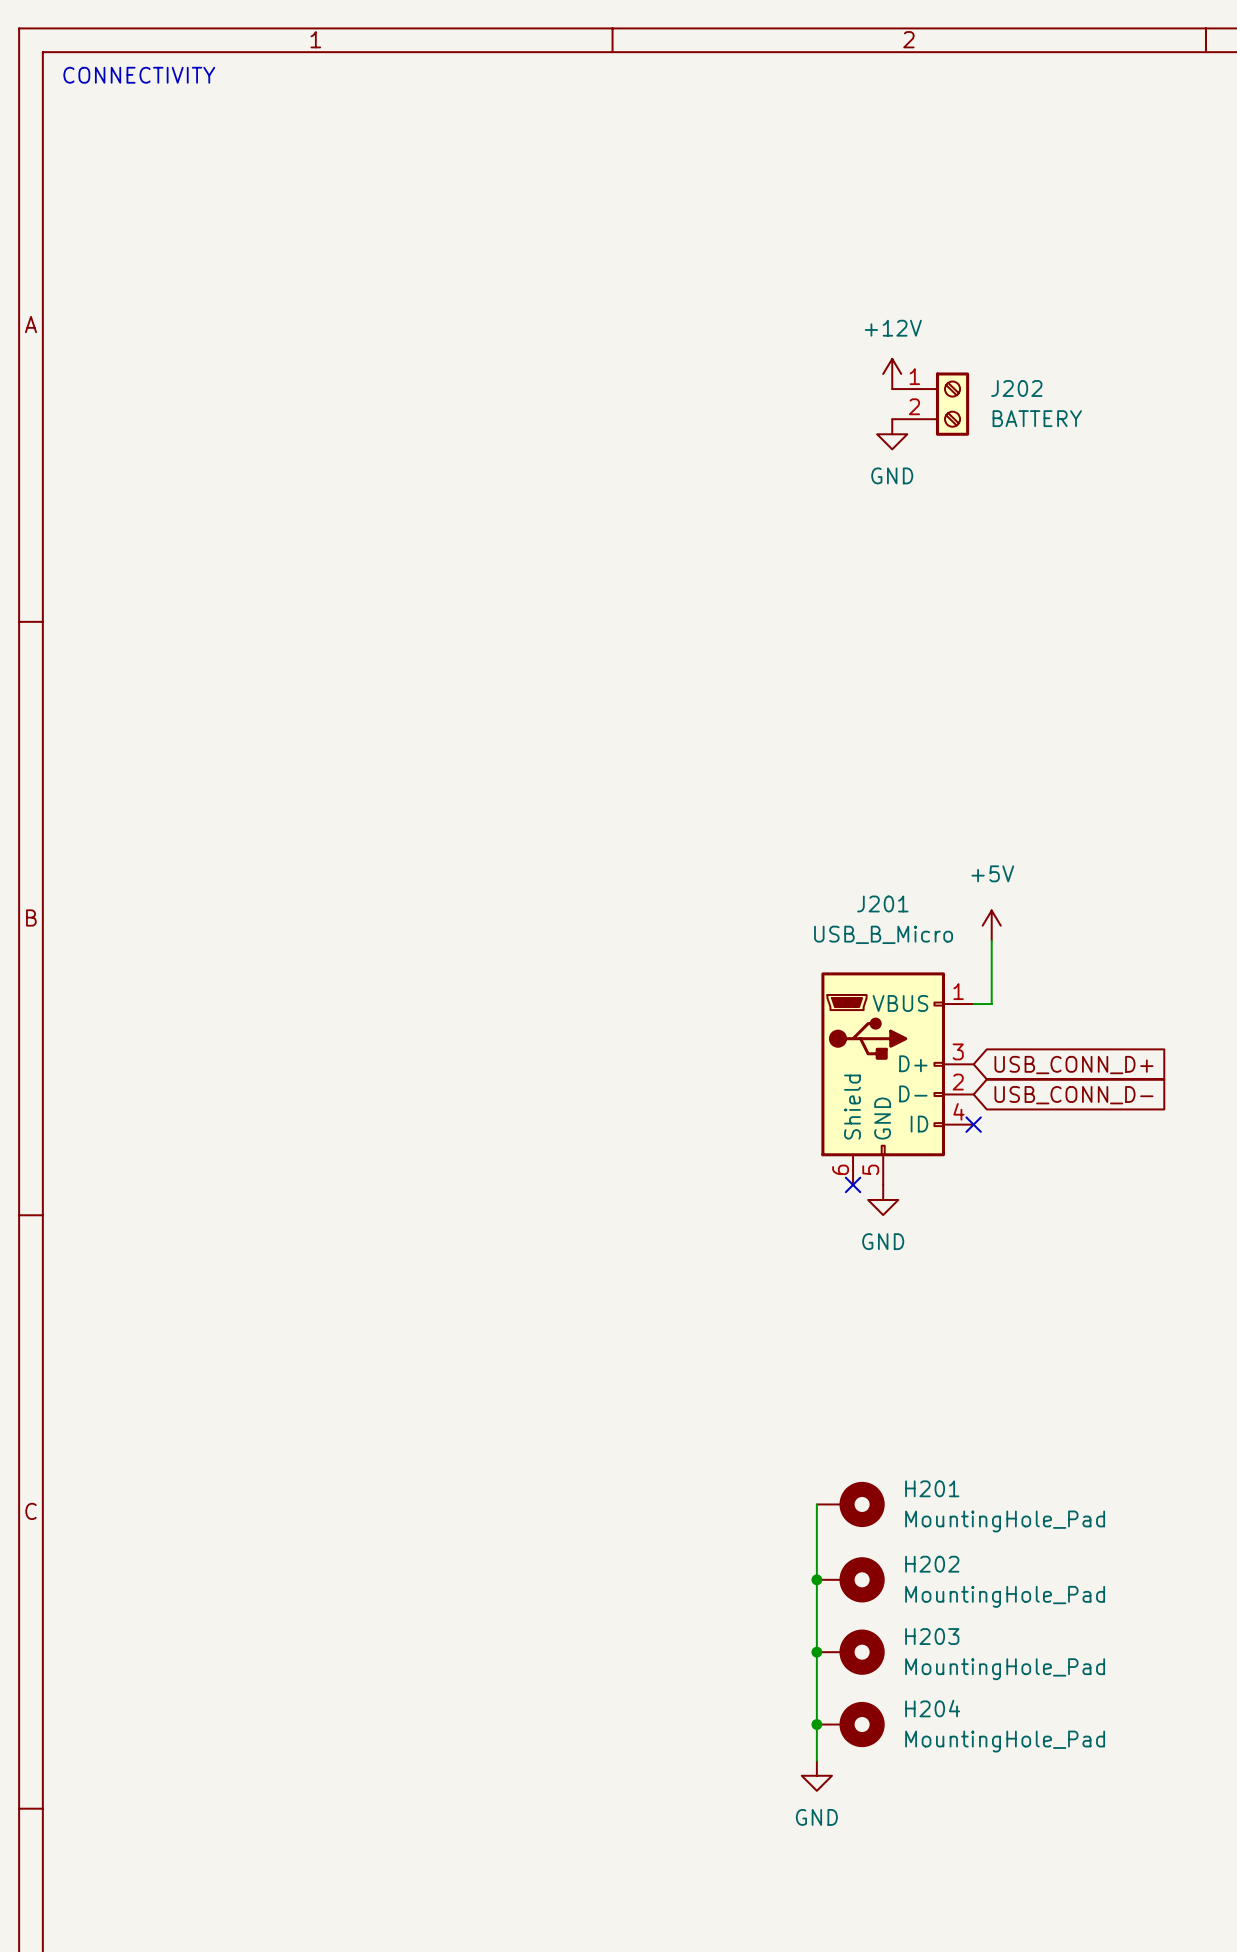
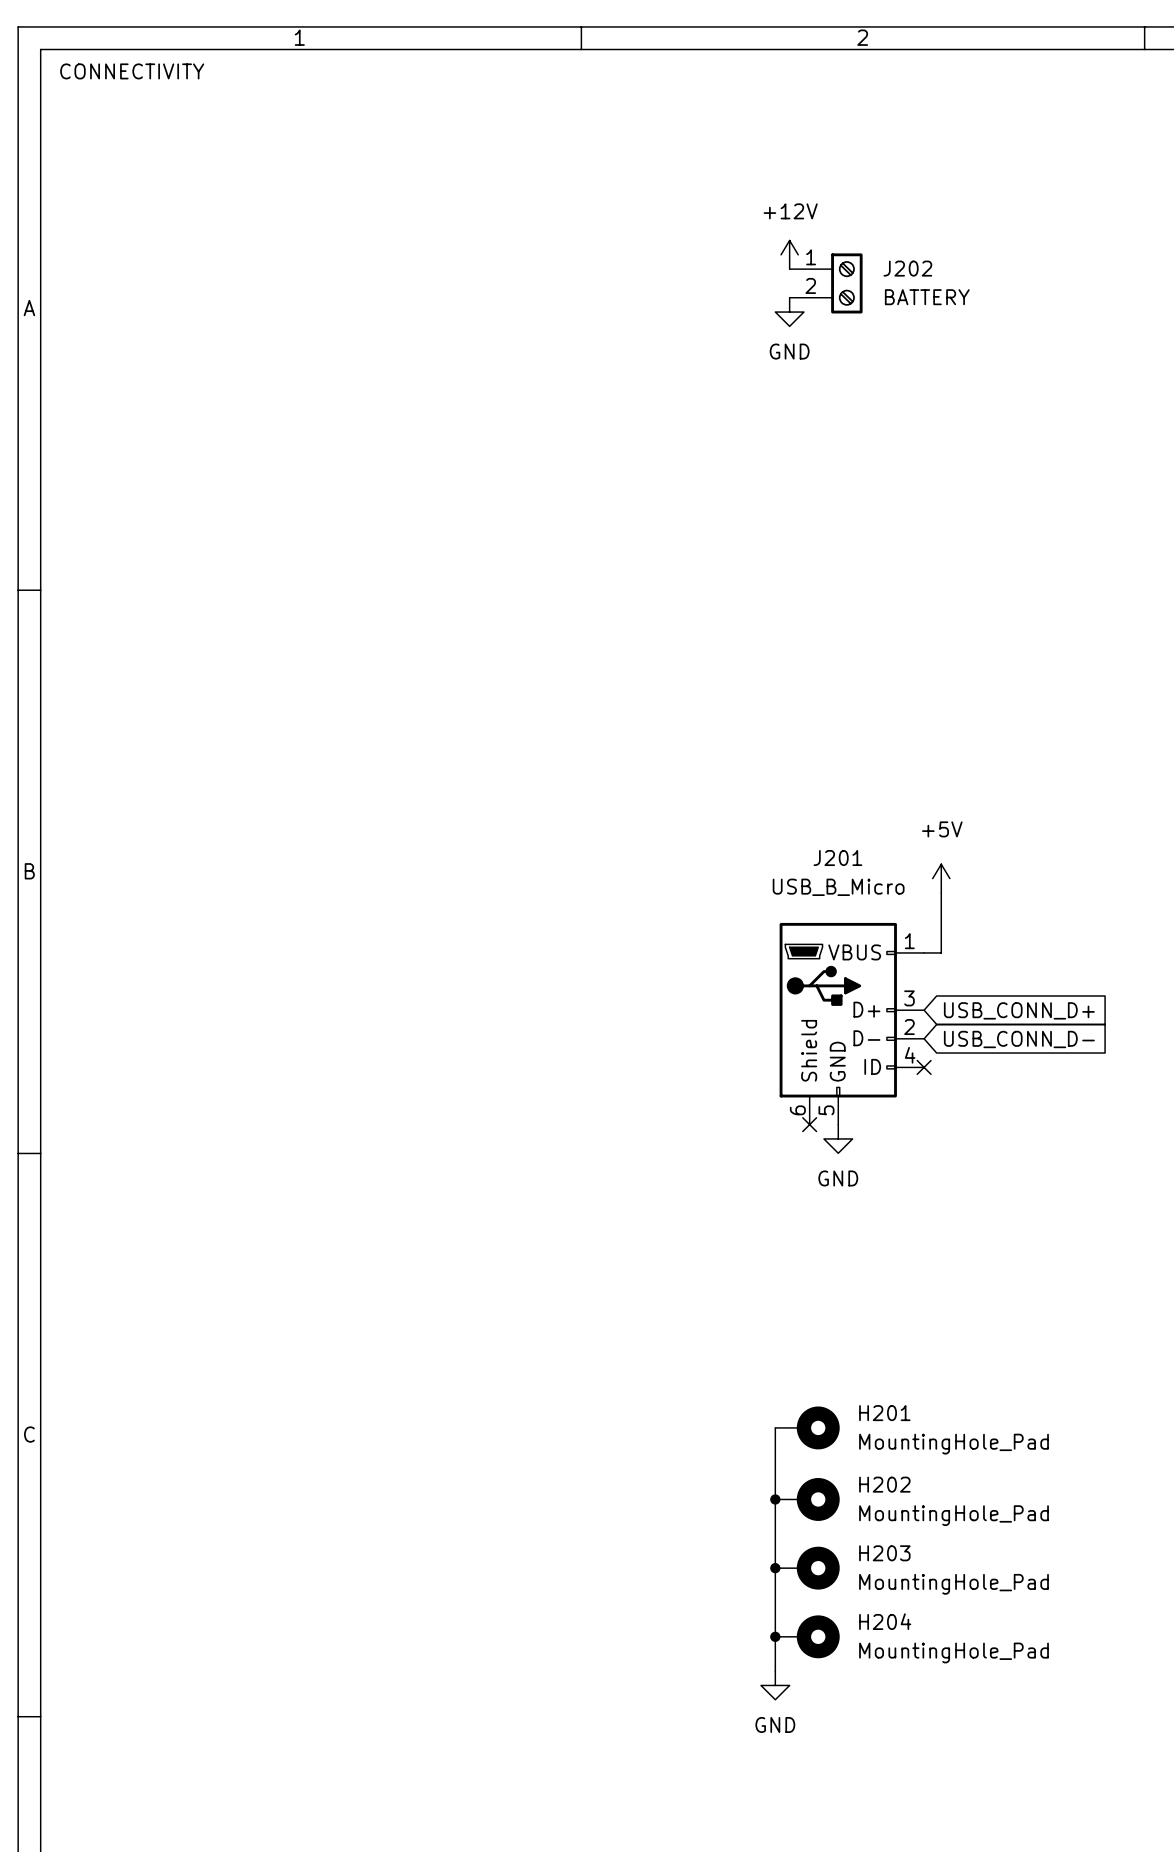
power symbol position: +12V (892, 373) -> +12V (789, 254)
J202 position: (930, 404) -> (826, 283)
power symbol position: GND (892, 434) -> GND (789, 312)

